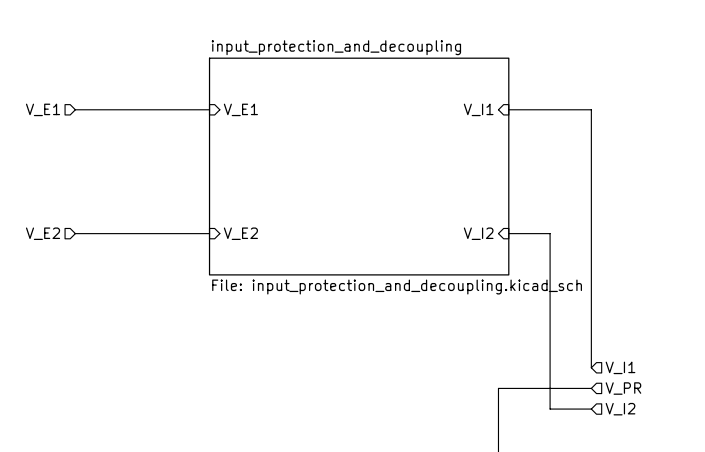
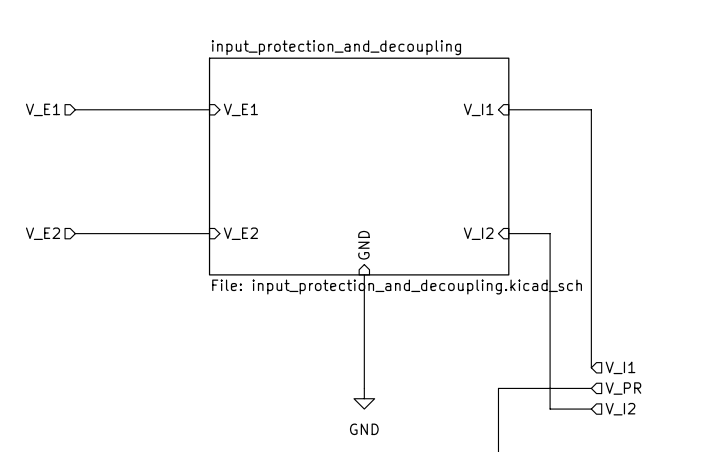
sheet pin: none -> GND (363, 245)
wire: none -> (364, 274) (364, 388)
power symbol: none -> GND (364, 398)

